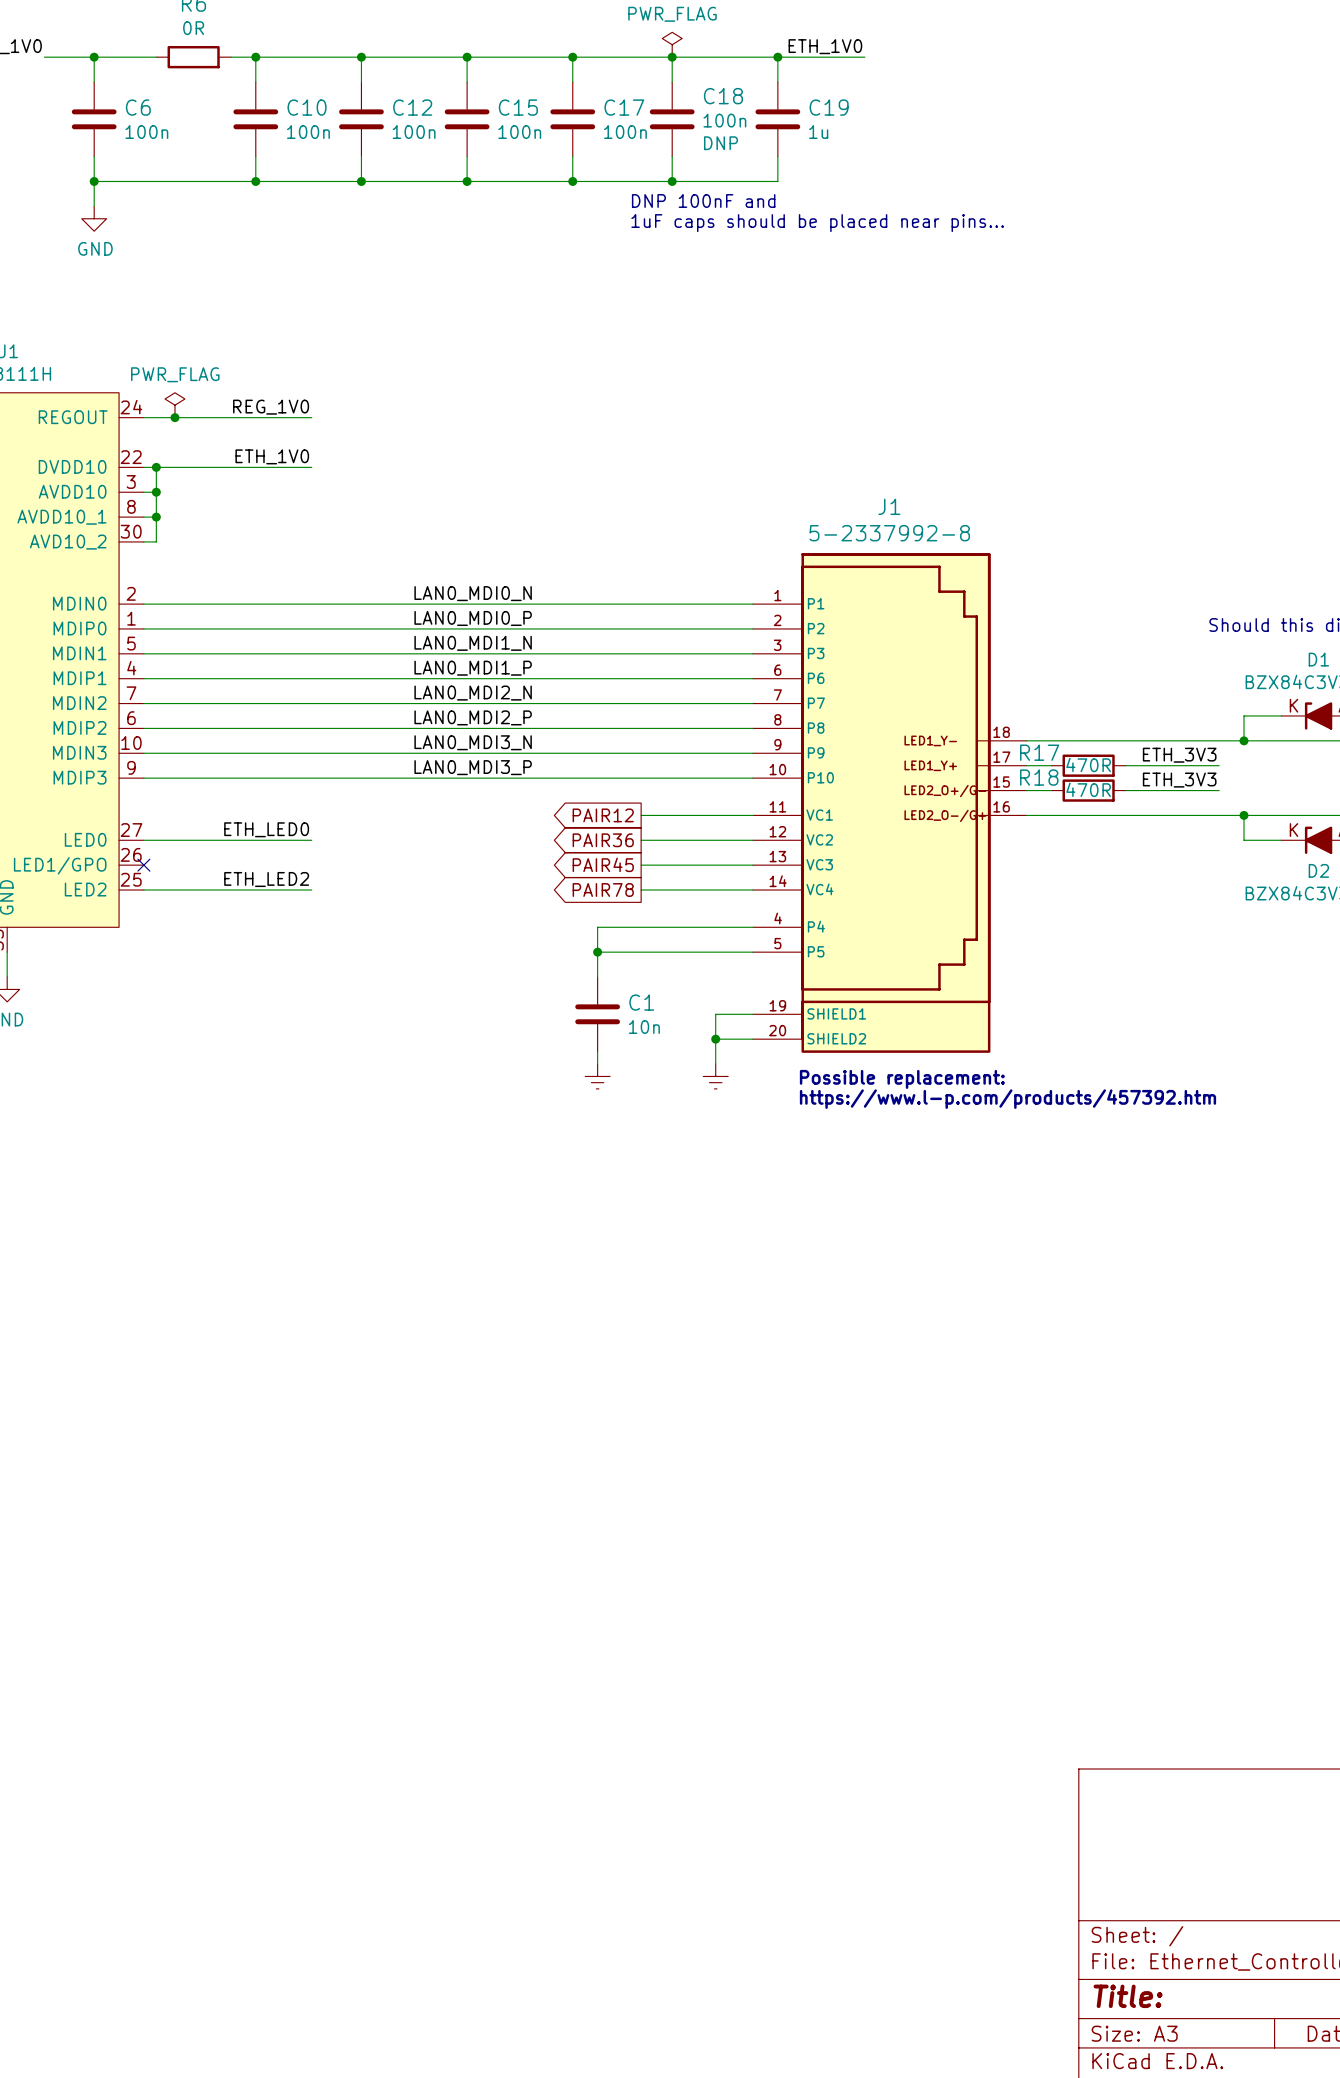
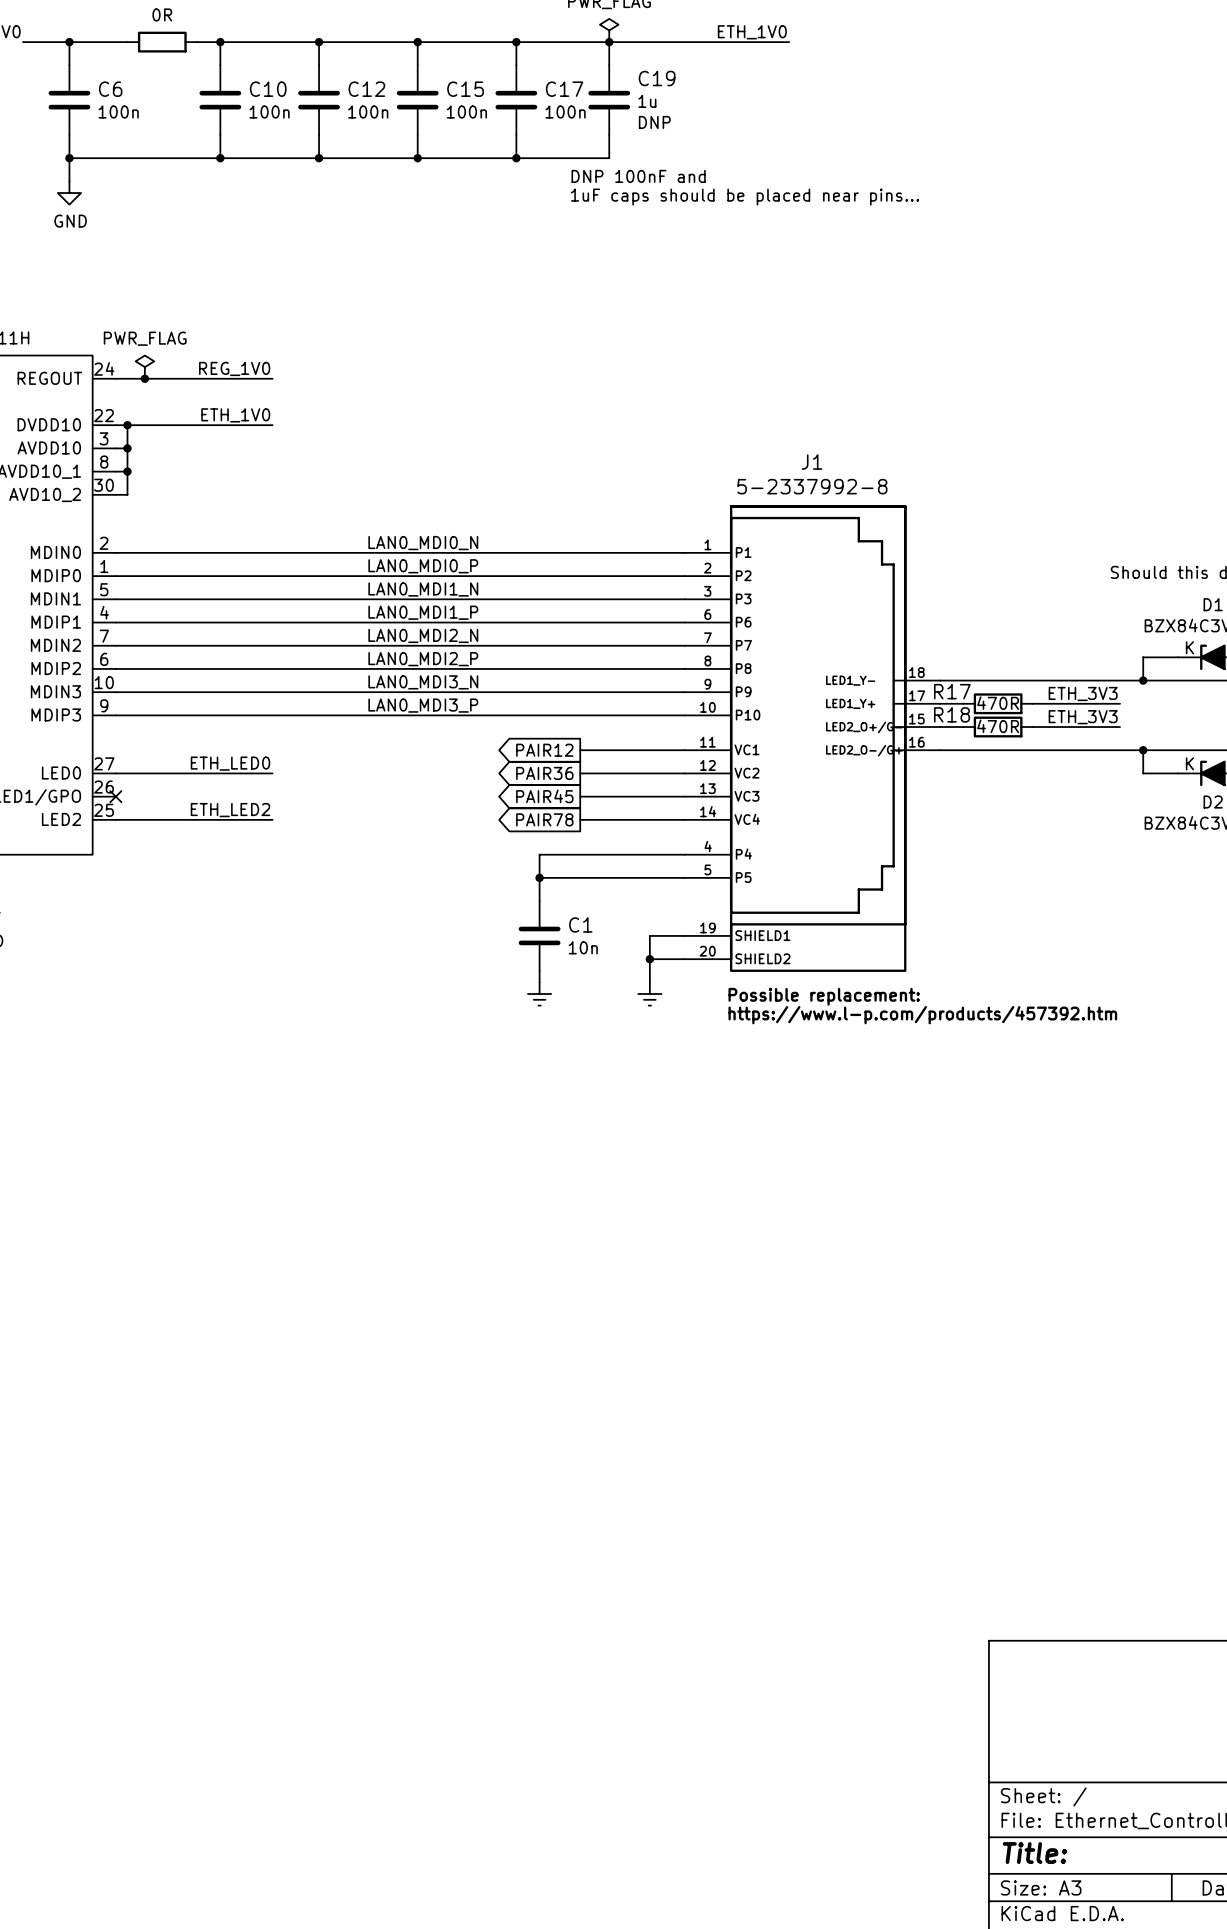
wire: (777, 57) (777, 82) -> none
junction: (777, 57) -> none
C18 name: C18 (723, 96) -> C19 (657, 78)
C19: (777, 119) -> none
C18 text: 100n (724, 120) -> 1u (647, 101)
wire: (777, 156) (777, 181) (672, 181) -> none
junction: (672, 181) -> none

